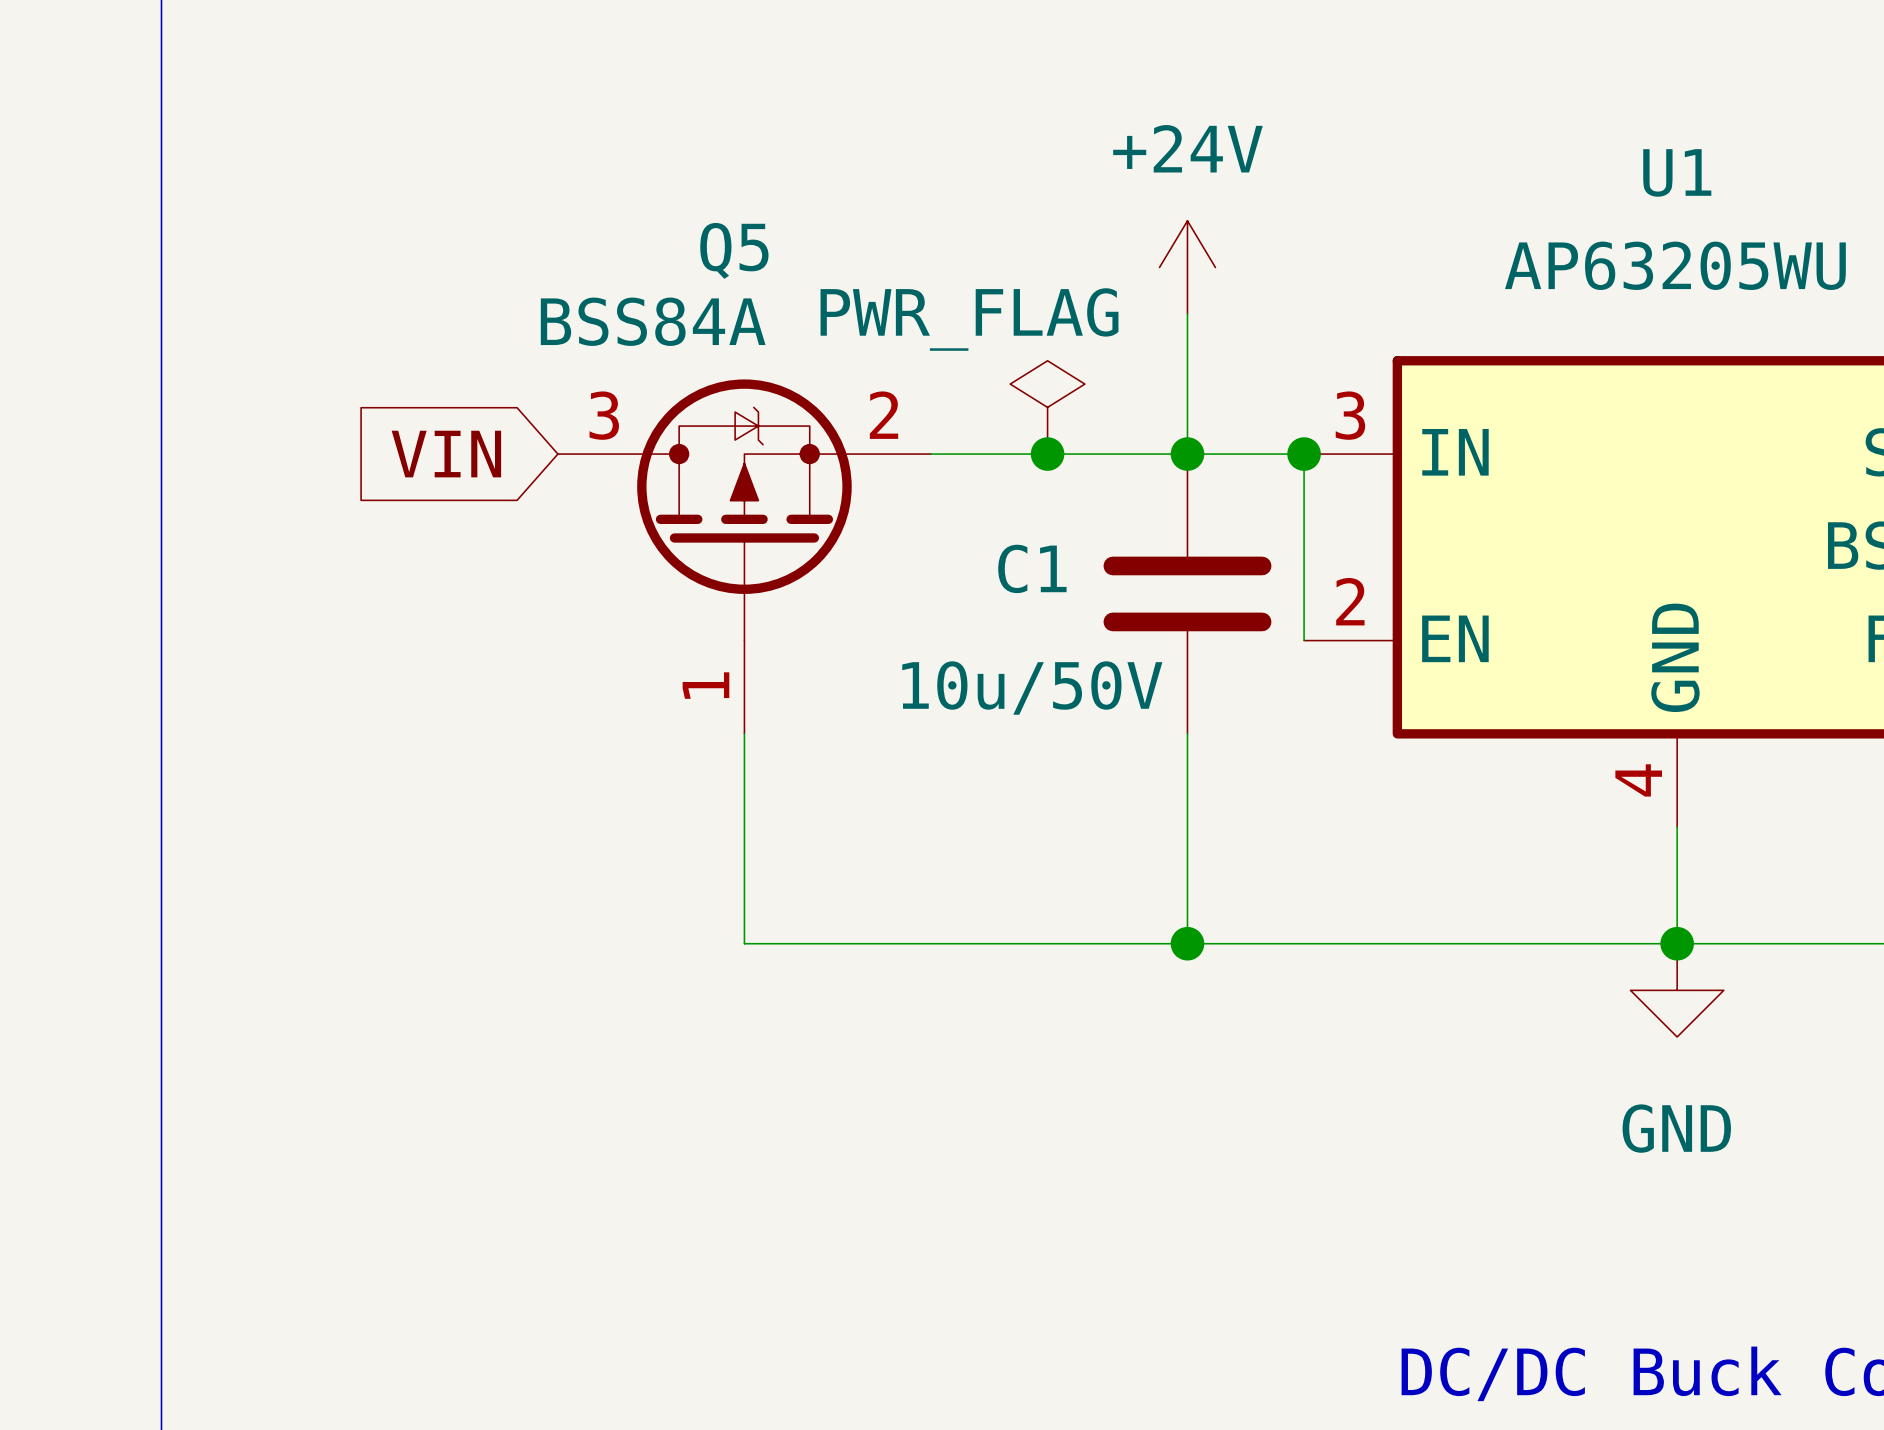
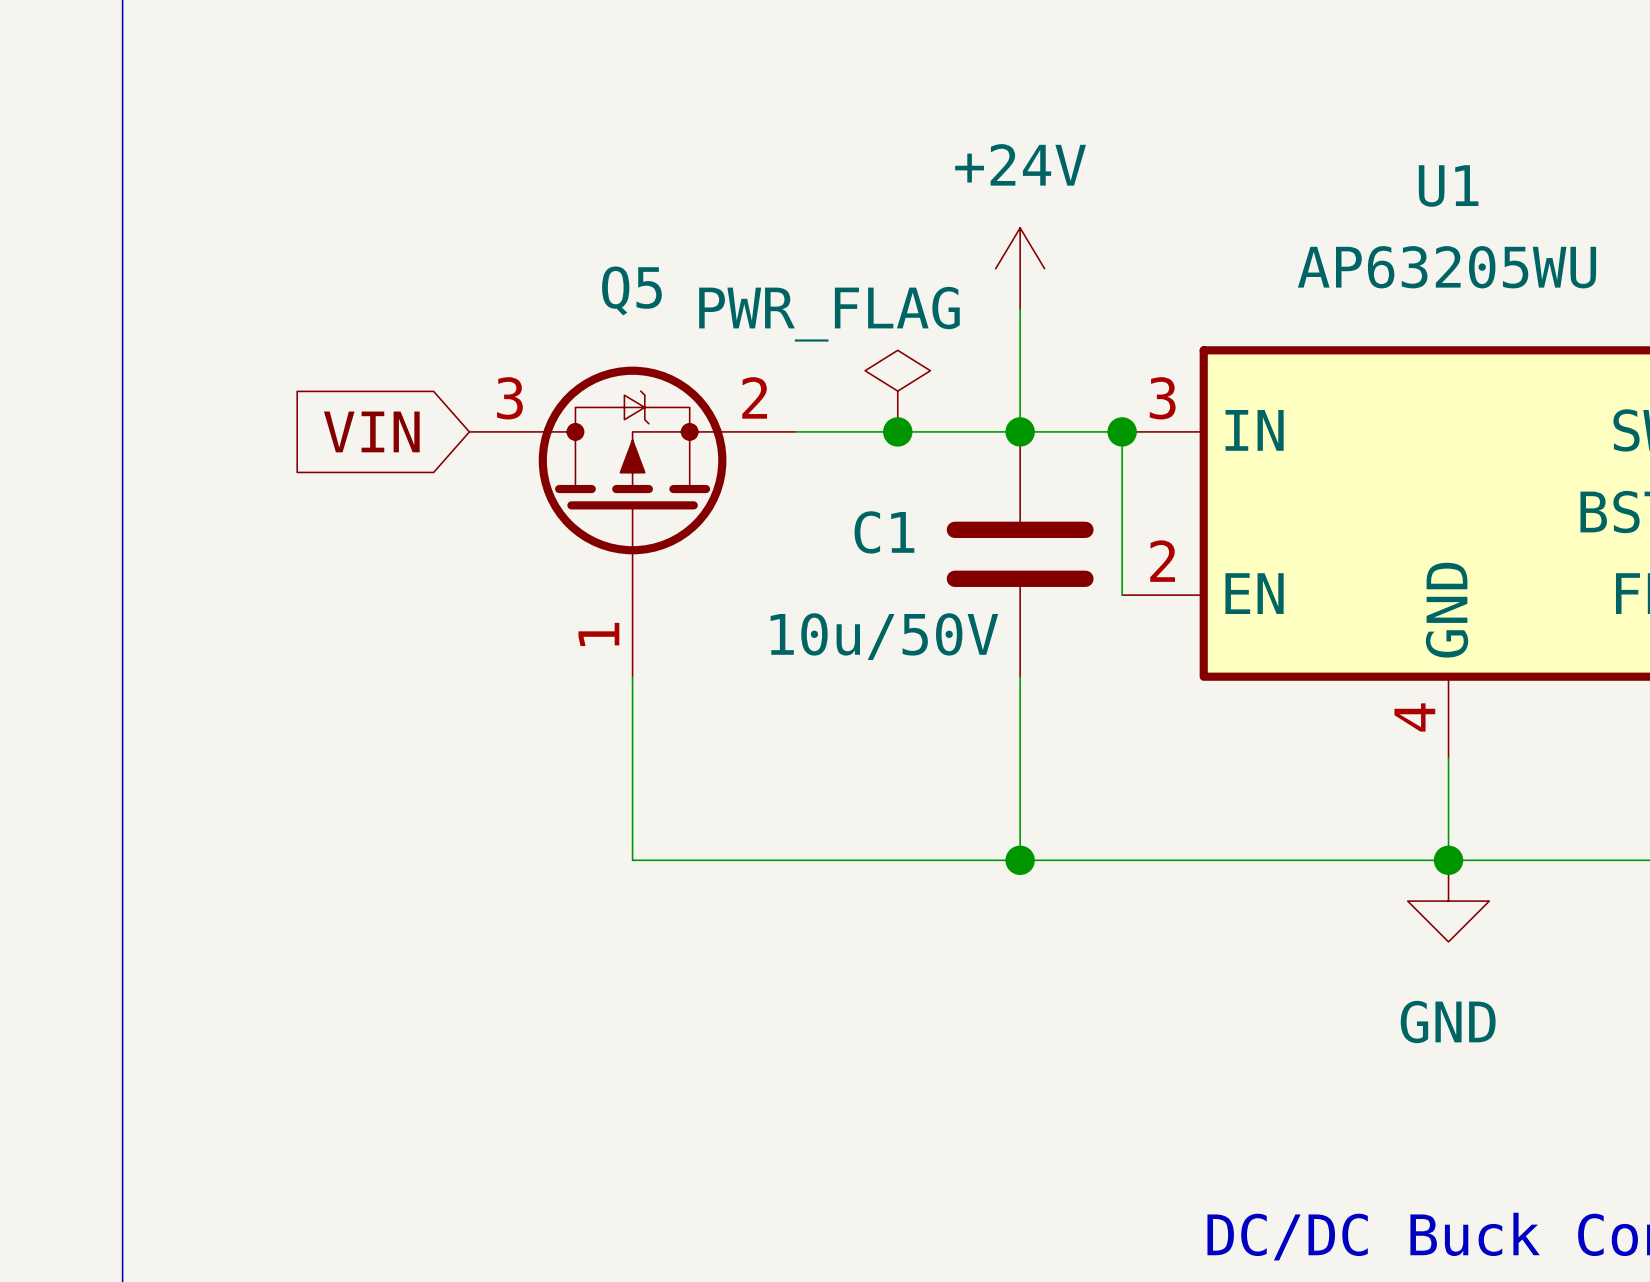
Q5 name position: Q5 (734, 250) -> Q5 (631, 290)
Q5 value: BSS84A (653, 321) -> none

